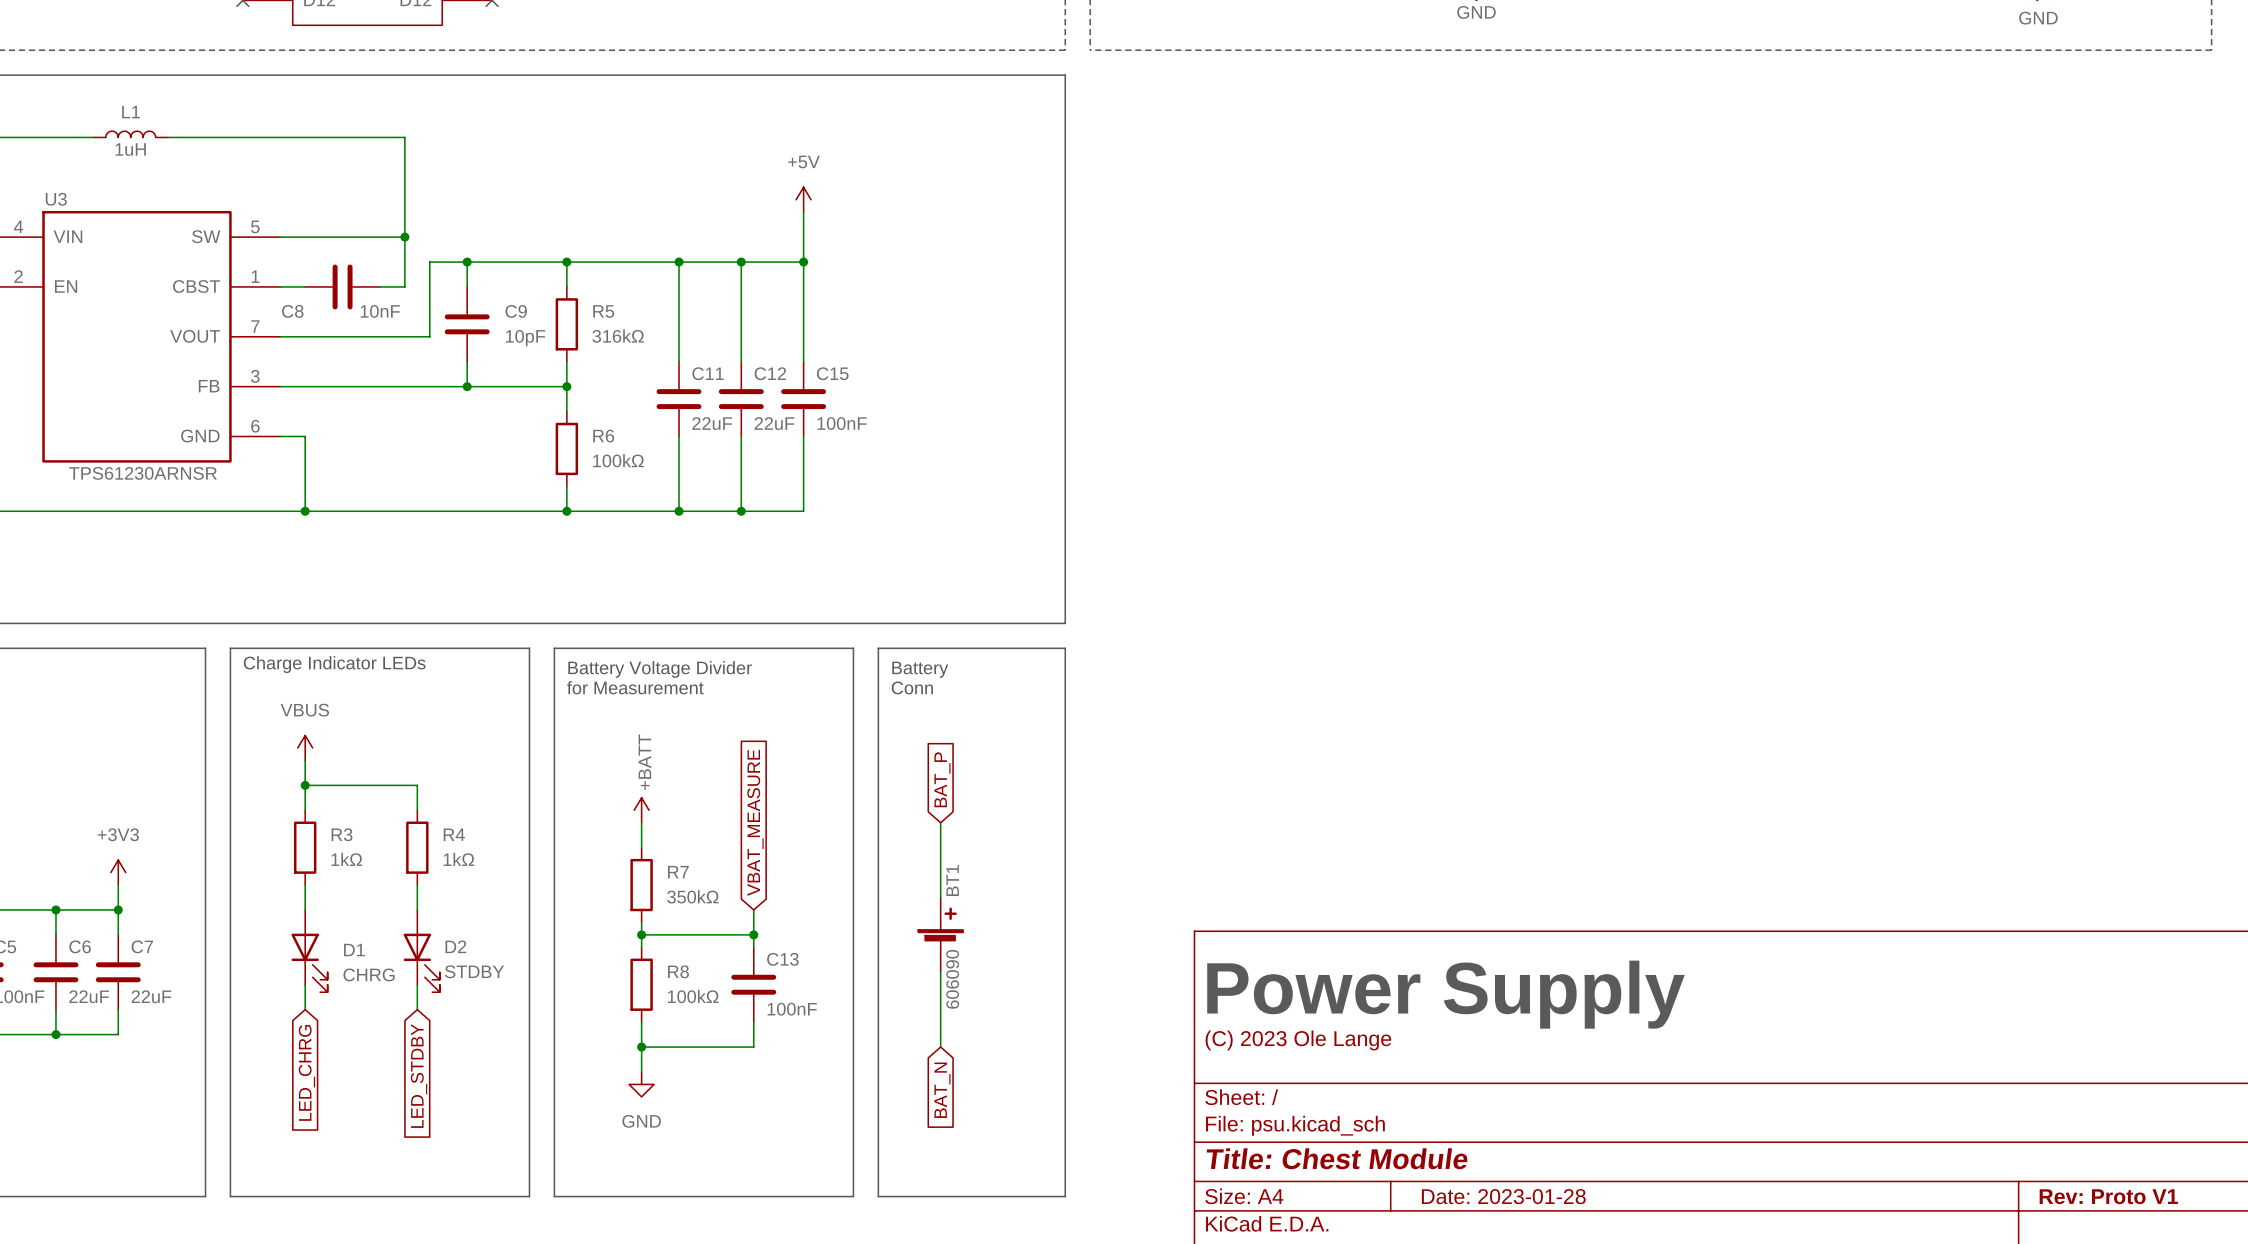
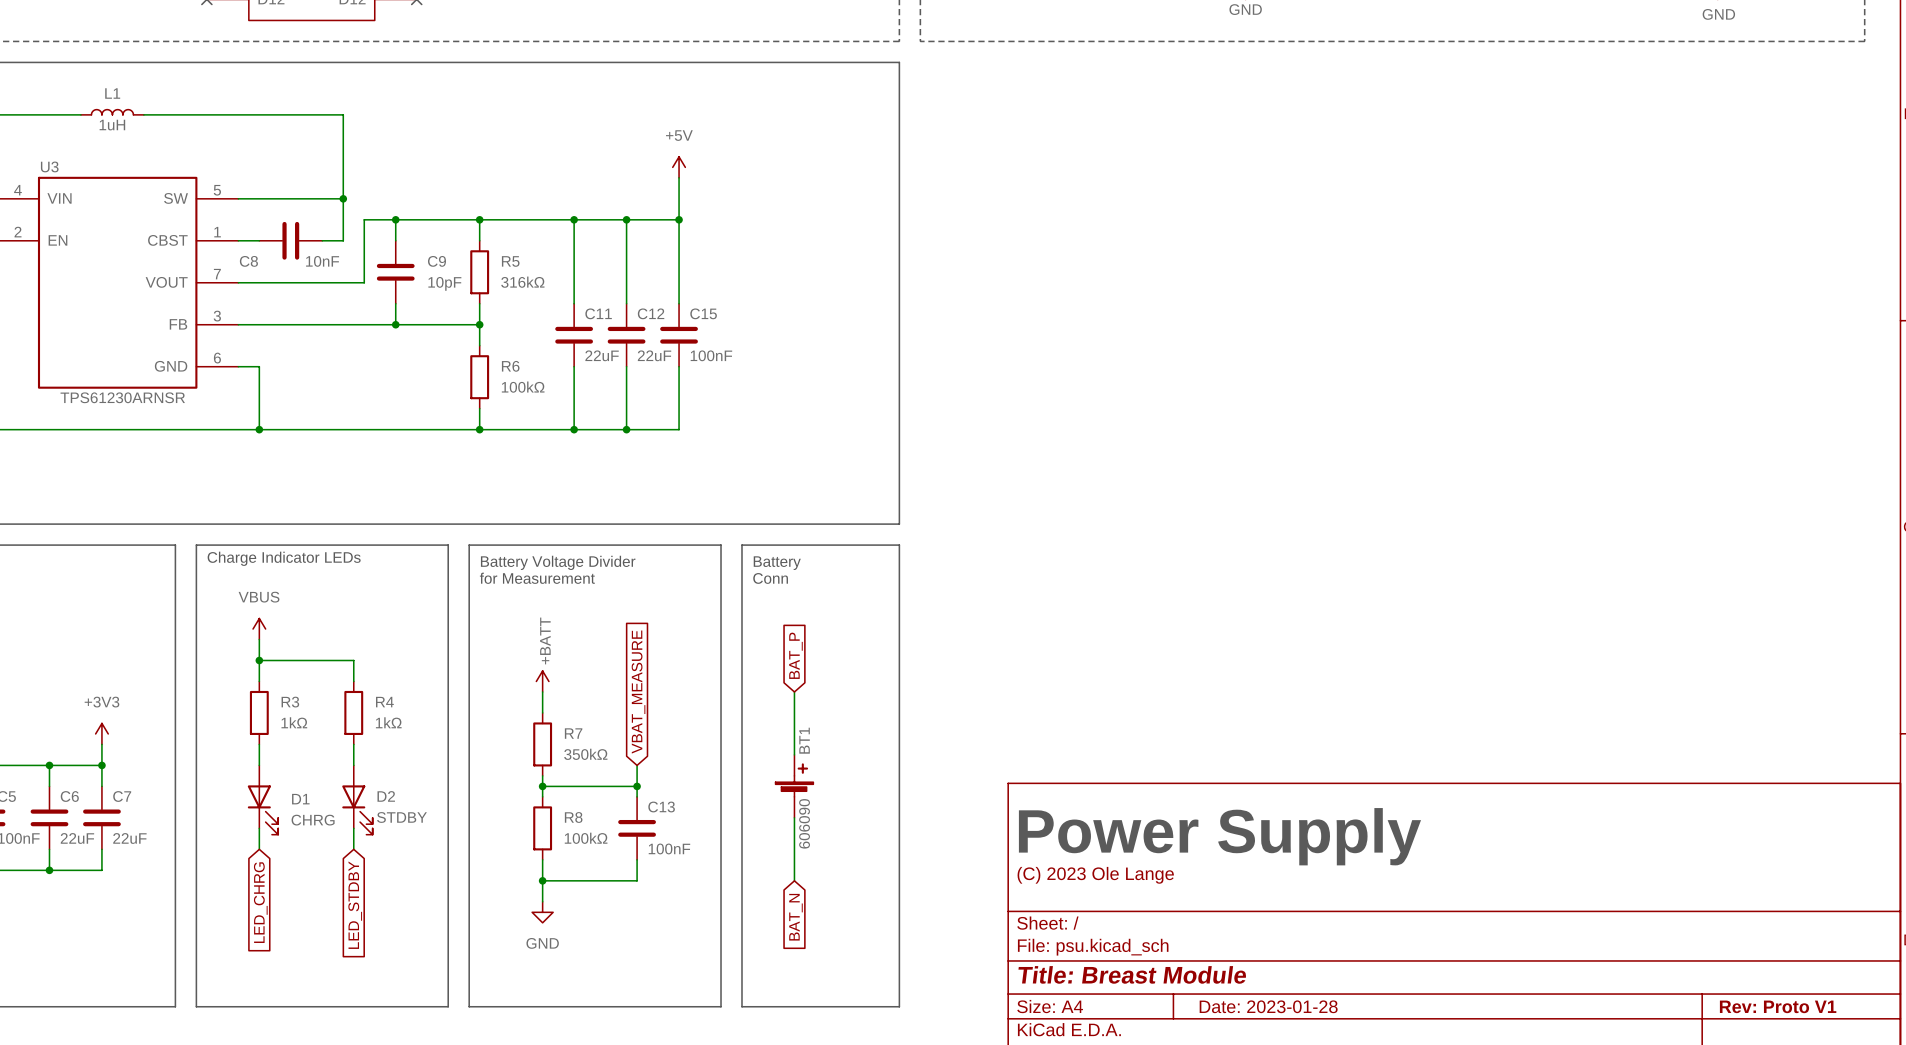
title block: Title: Chest Module (1337, 1158) -> Title: Breast Module (1132, 974)

